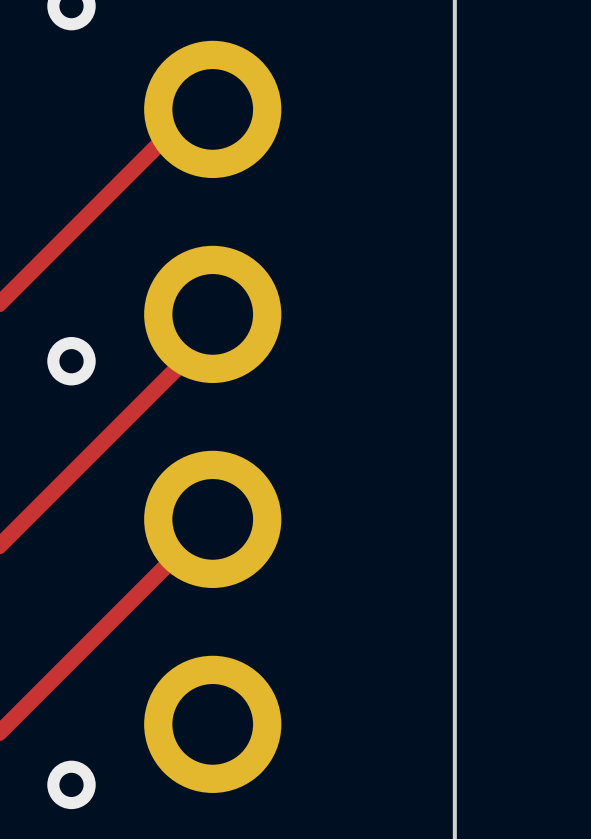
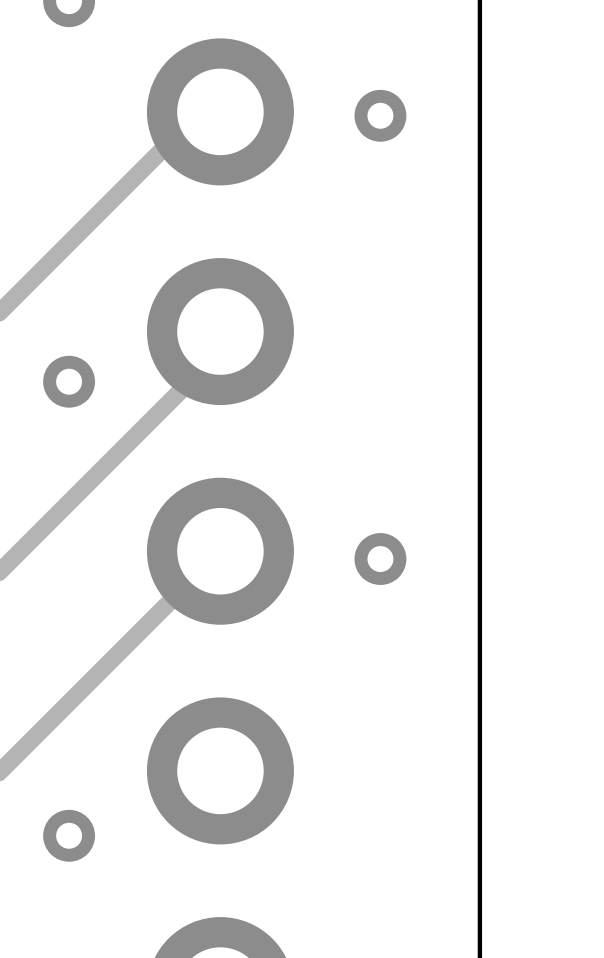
via: none -> (380, 115)
via: none -> (380, 559)

